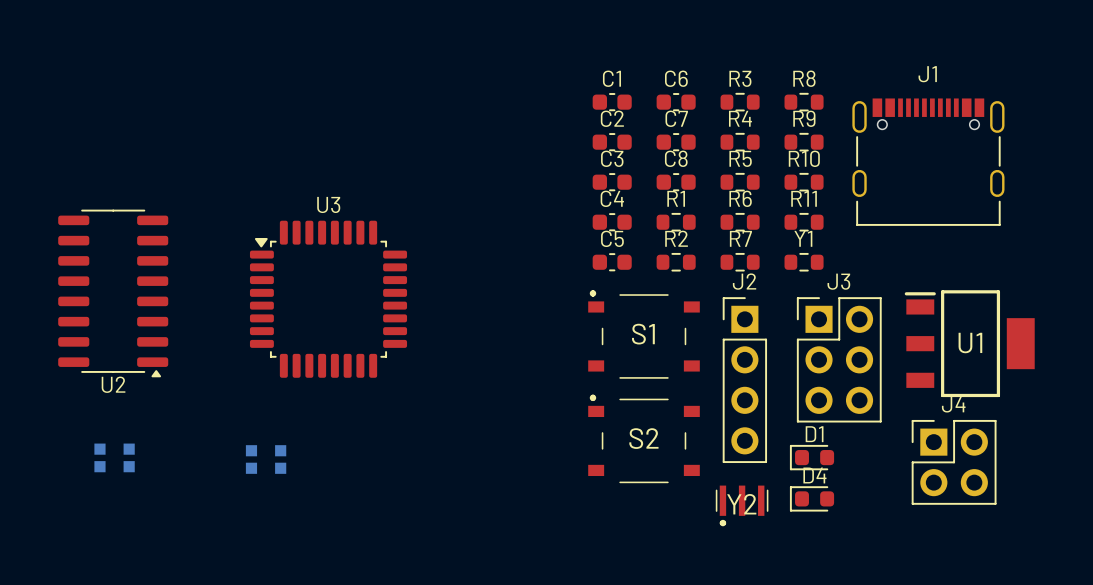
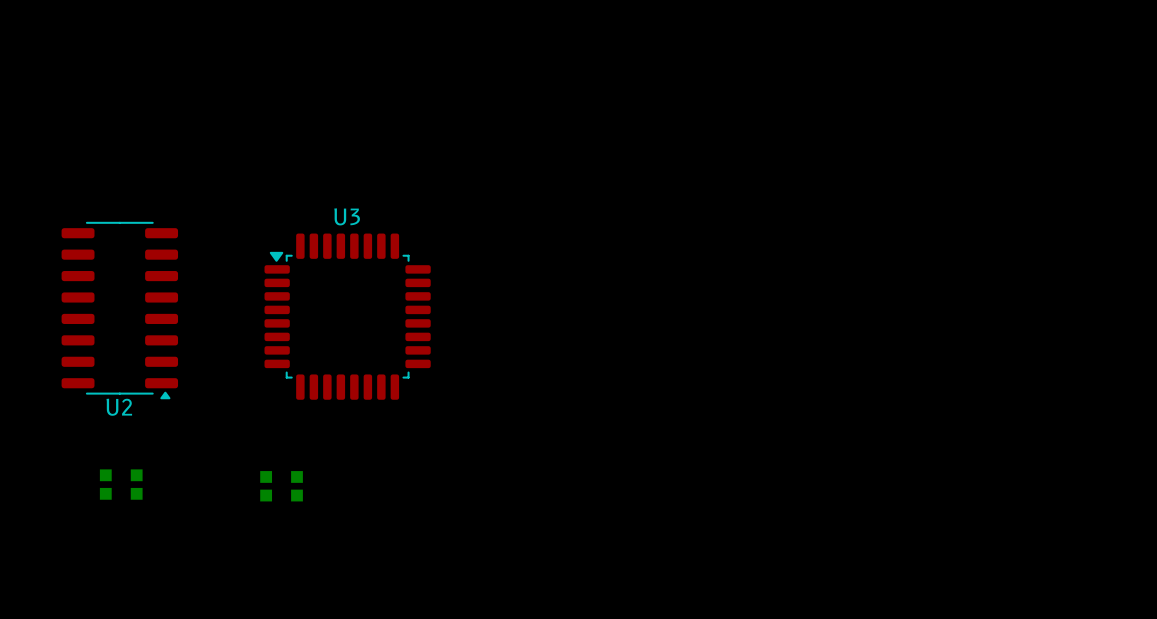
C1: (612, 102) -> none
C6: (676, 102) -> none
R3: (740, 102) -> none
R8: (804, 102) -> none
C2: (612, 142) -> none
C7: (676, 142) -> none
R4: (740, 142) -> none
R9: (804, 142) -> none
J1: (928, 162) -> none
C3: (612, 182) -> none
C8: (676, 182) -> none
R5: (740, 182) -> none
R10: (804, 182) -> none
C4: (612, 222) -> none
R1: (676, 222) -> none
R6: (740, 222) -> none
R11: (804, 222) -> none
C5: (612, 262) -> none
R2: (676, 262) -> none
R7: (740, 262) -> none
Y1: (804, 262) -> none
S1: (644, 334) -> none
U1: (969, 343) -> none
J3: (839, 359) -> none
J2: (744, 380) -> none
S2: (644, 438) -> none
D1: (812, 457) -> none
J4: (954, 462) -> none
D4: (812, 498) -> none
Y2: (742, 505) -> none

